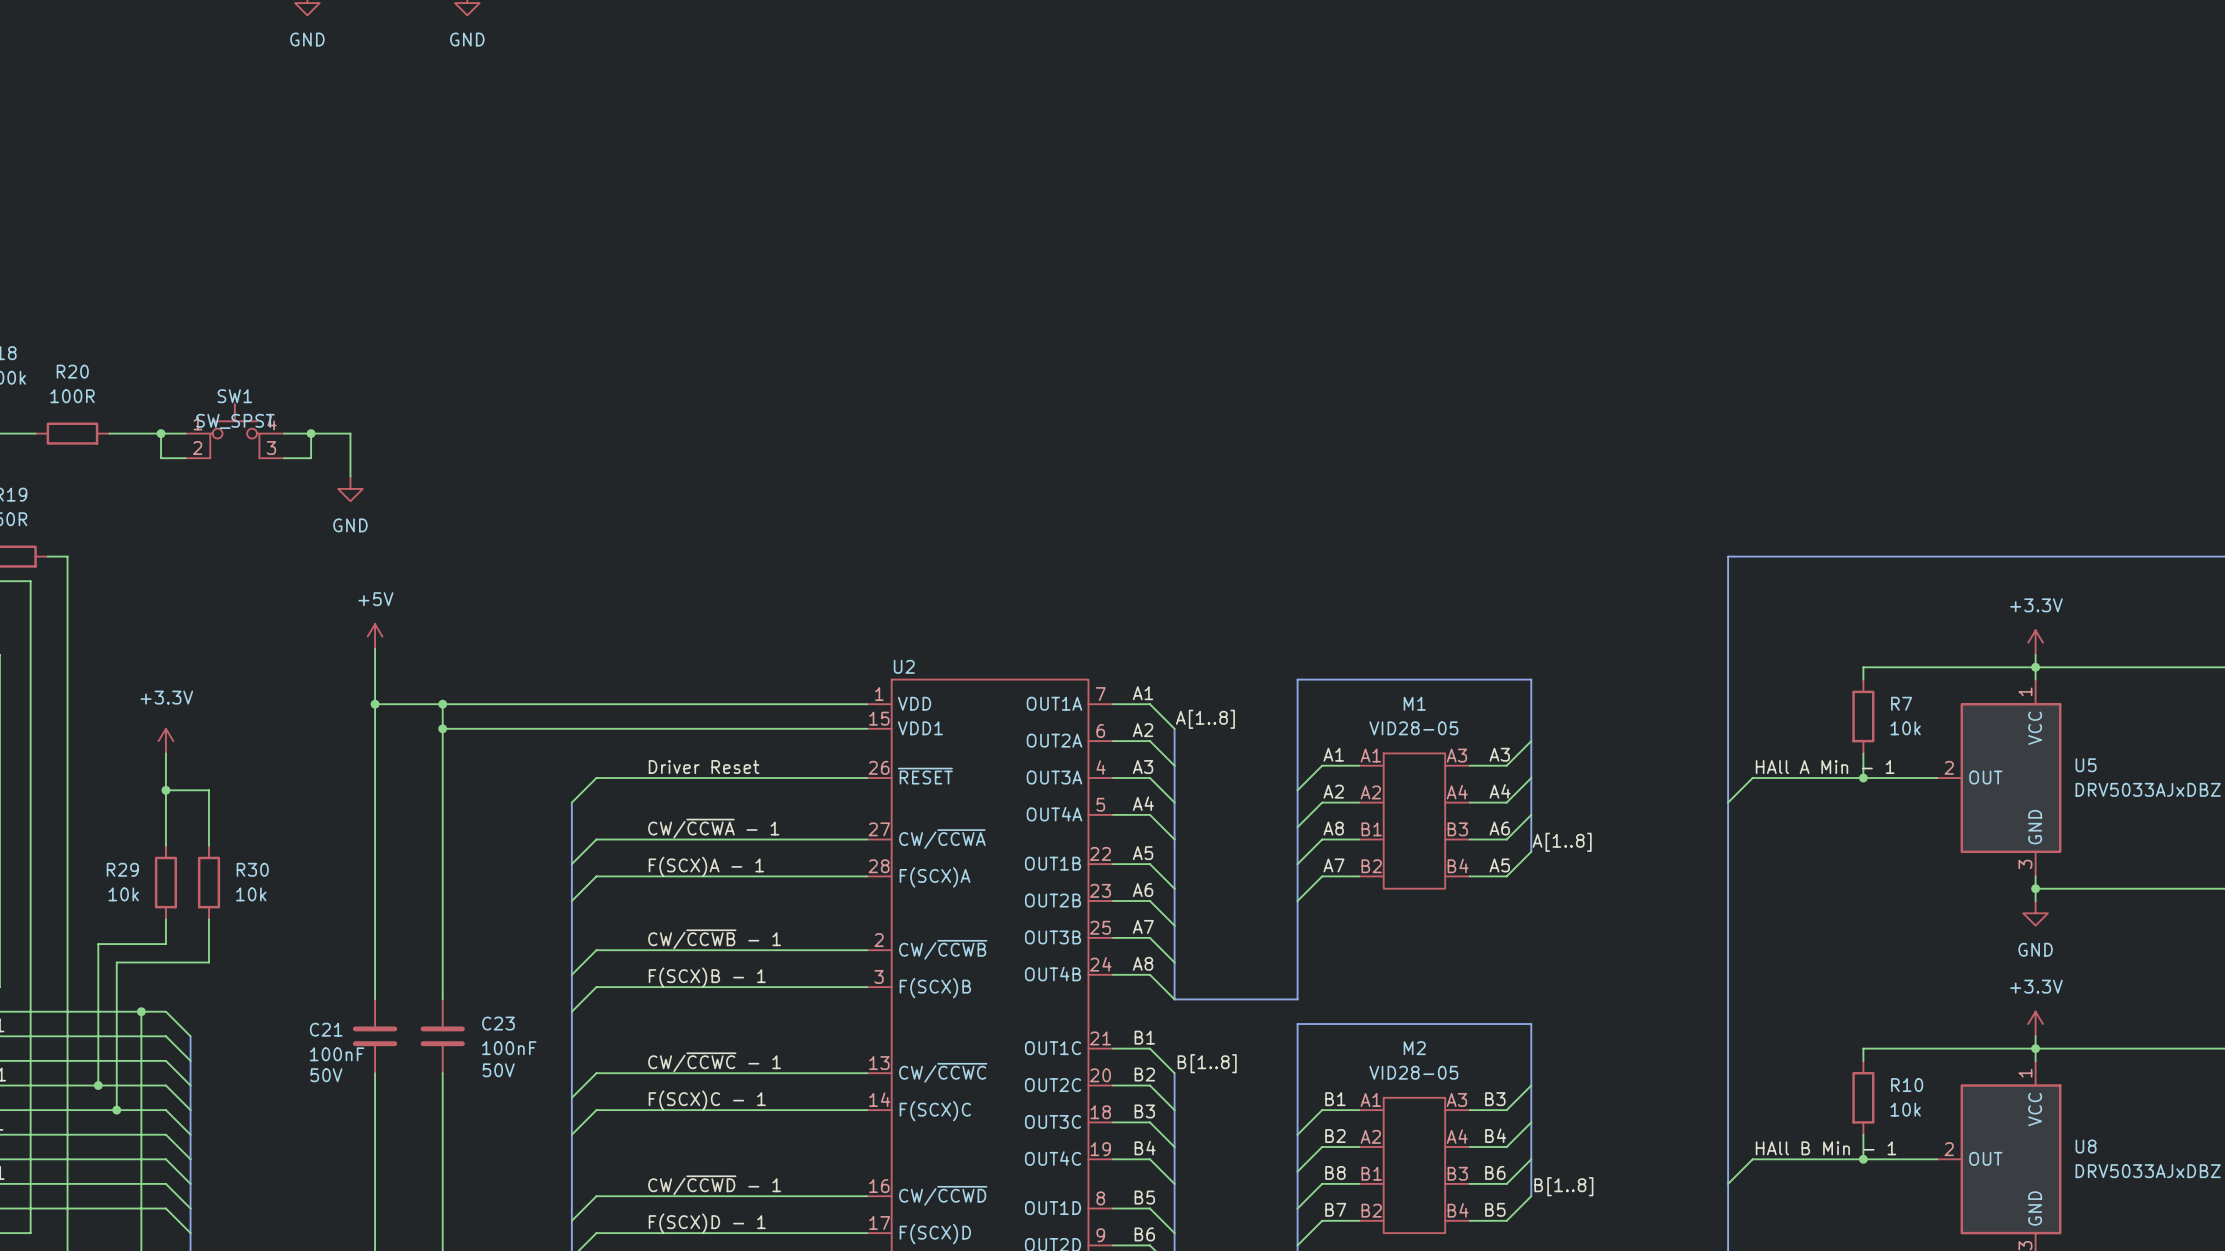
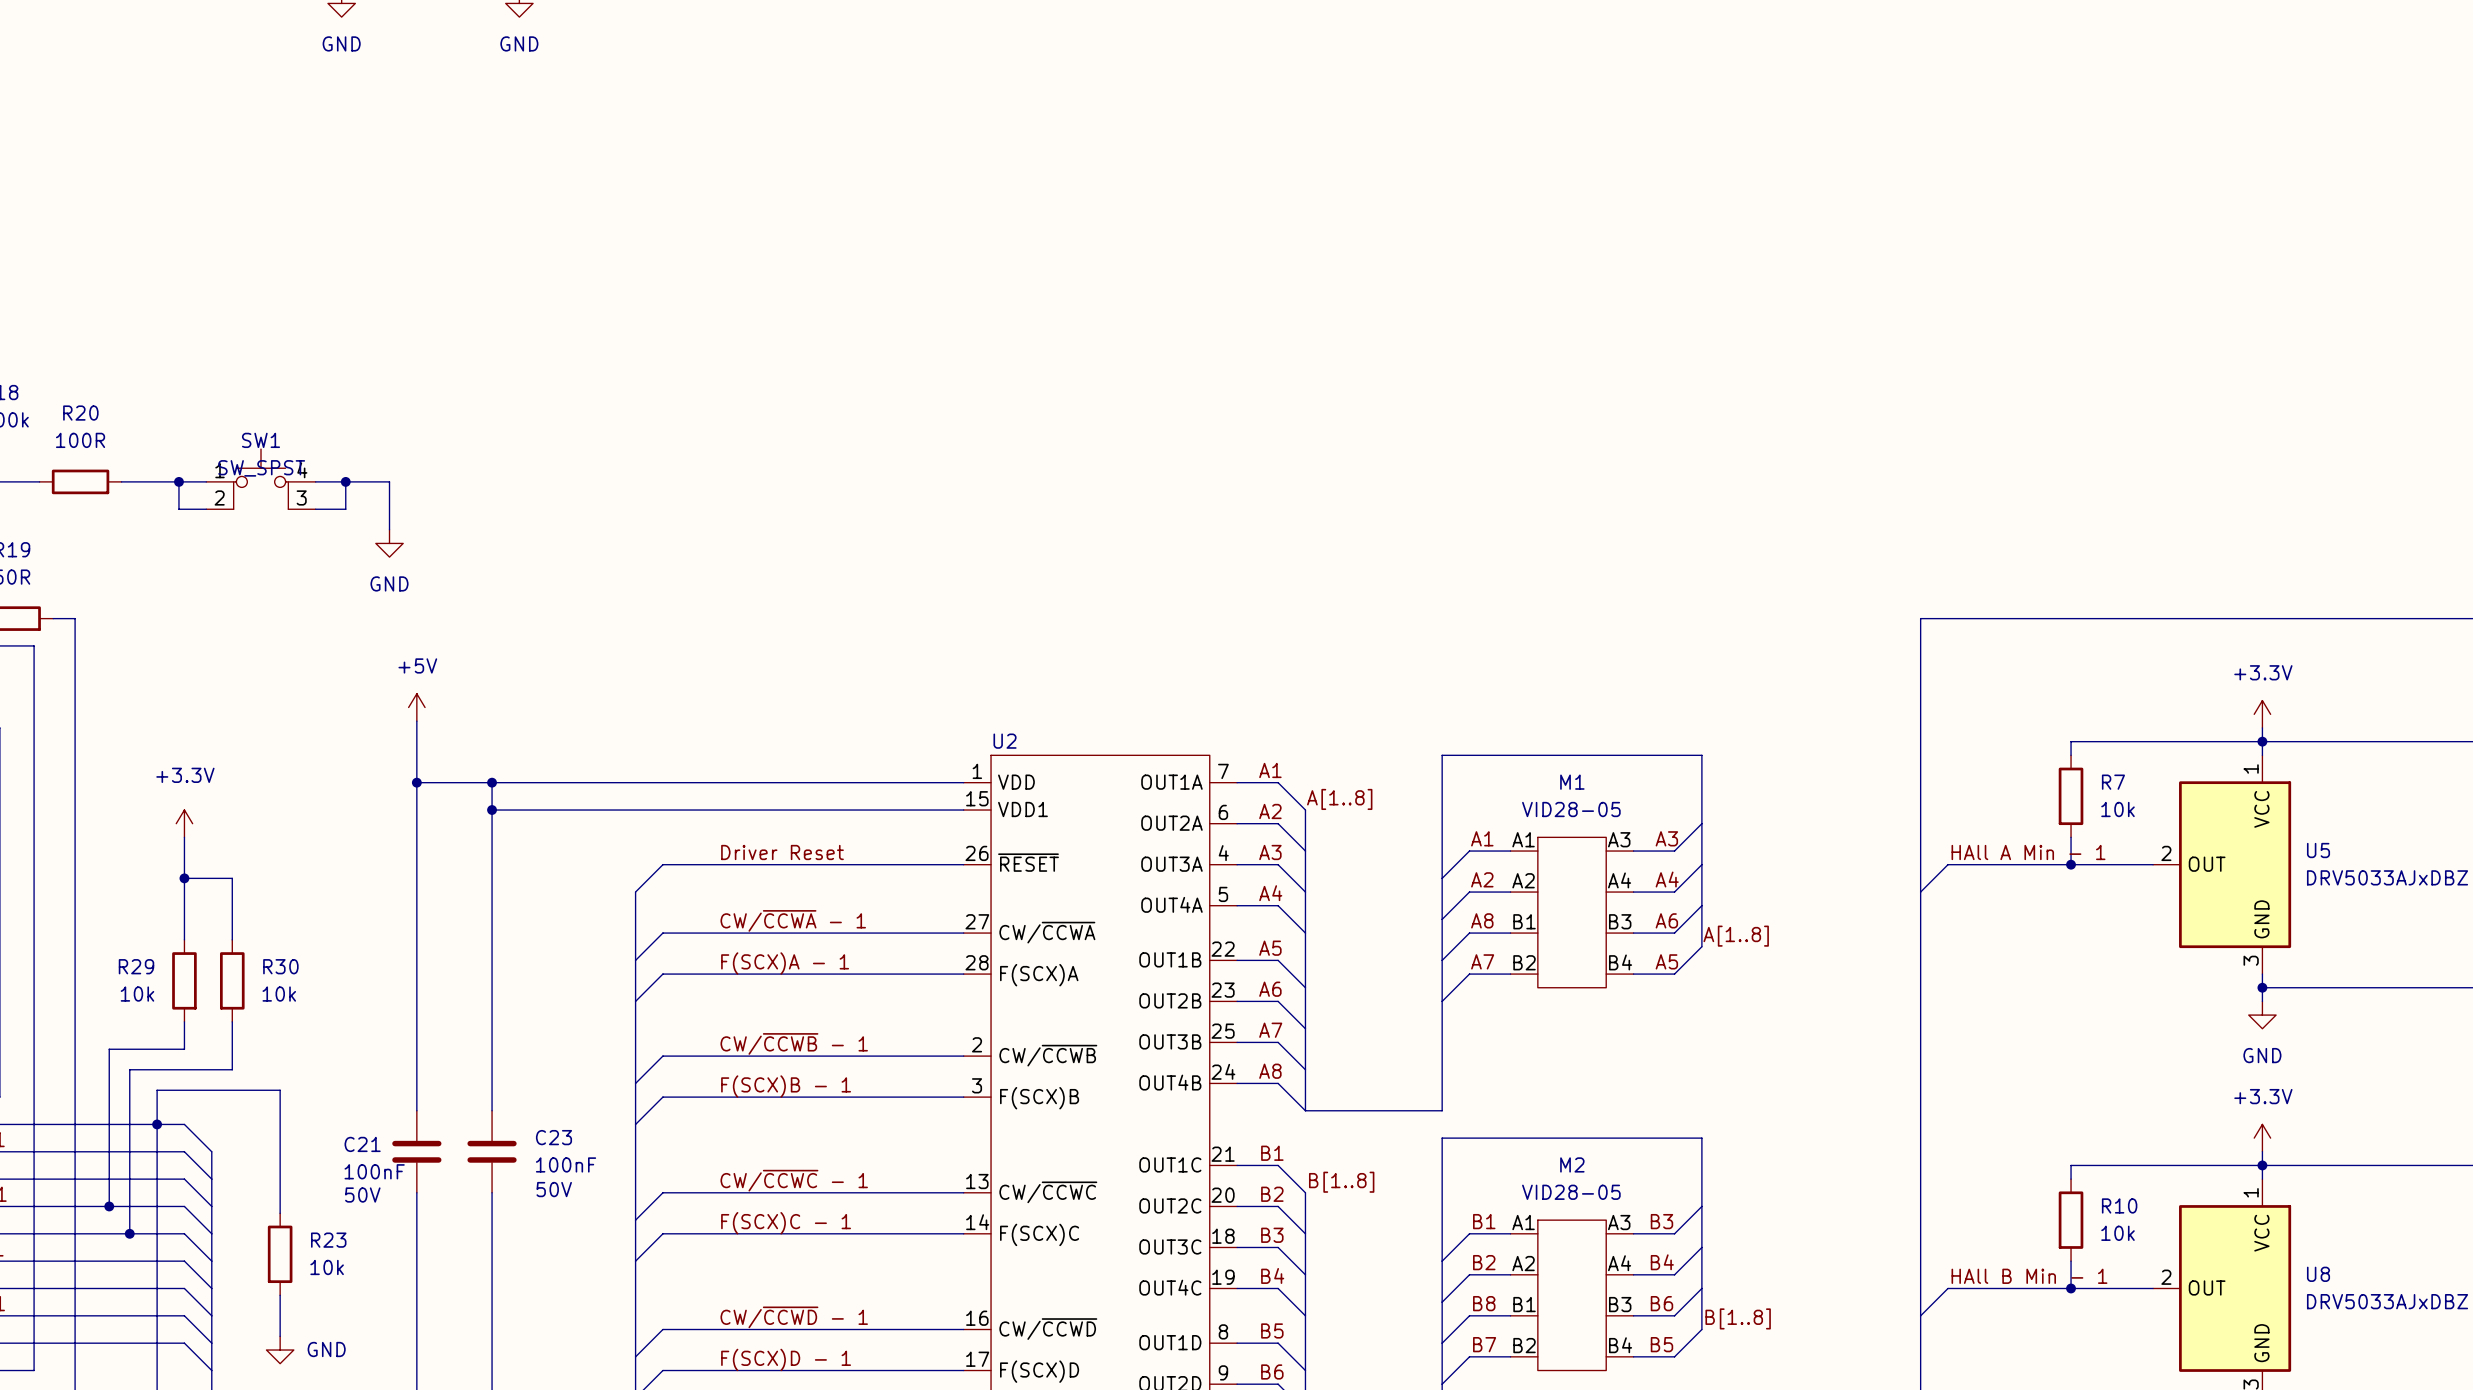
wire: none -> (157, 1124) (157, 1090) (280, 1090) (280, 1213)
R23: none -> 10k (280, 1254)
wire: none -> (280, 1295) (280, 1336)
power symbol: none -> GND (280, 1350)

